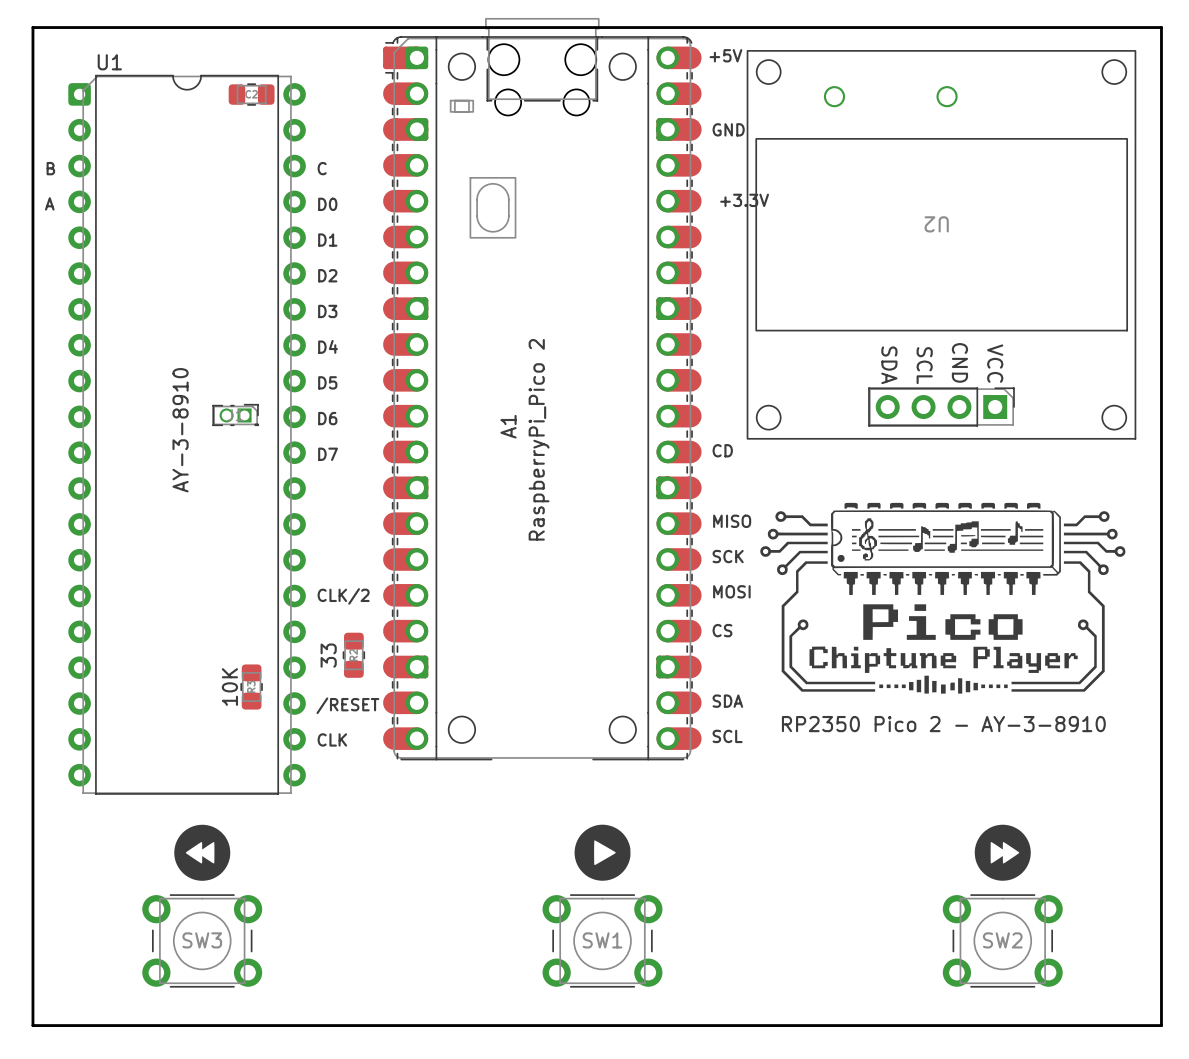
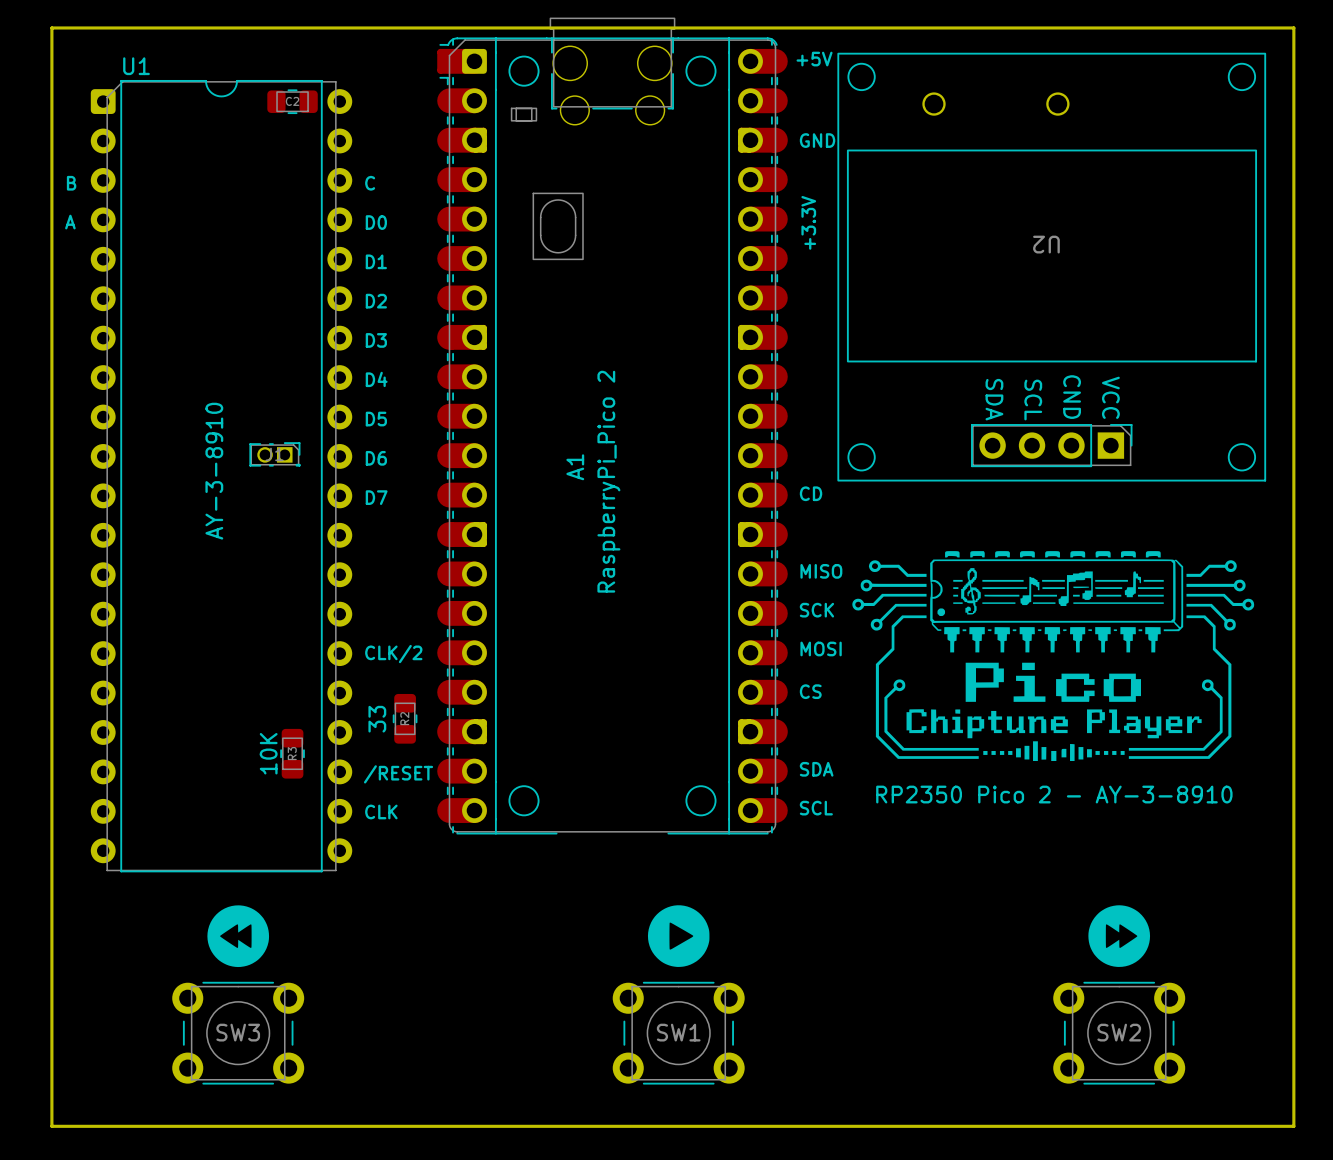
text rotation: 0° (744, 200) -> 90° counterclockwise (808, 222)

